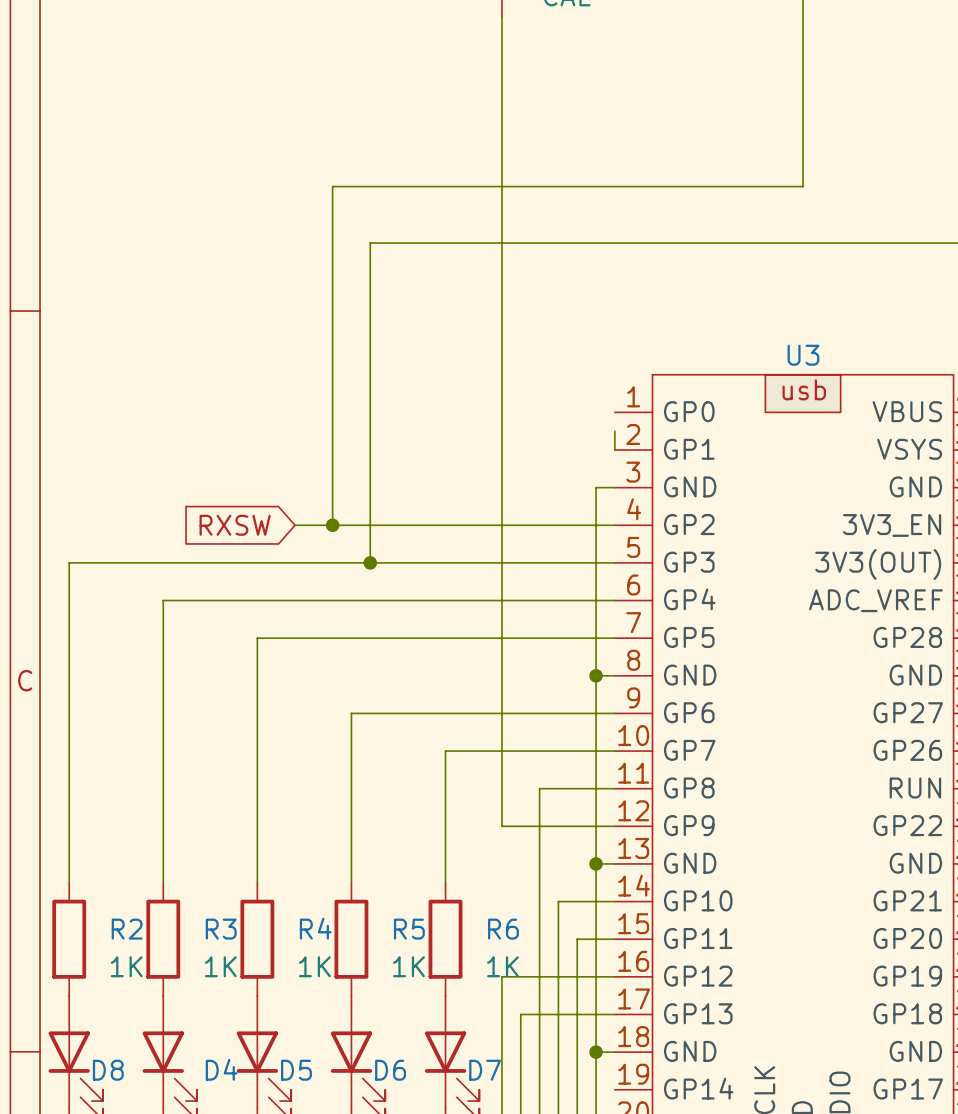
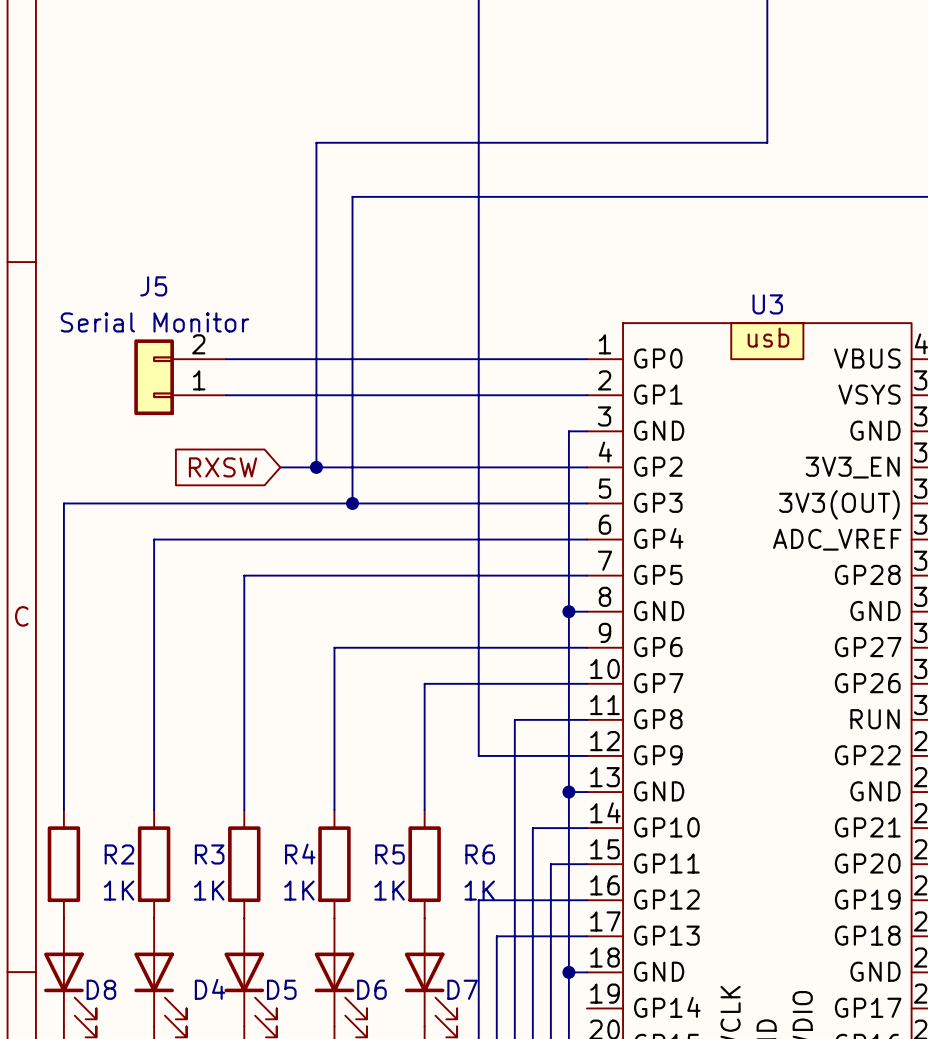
wire: none -> (226, 359) (586, 359)
J5: none -> Serial Monitor (180, 377)
wire: (614, 431) (614, 450) -> (226, 395) (586, 395)

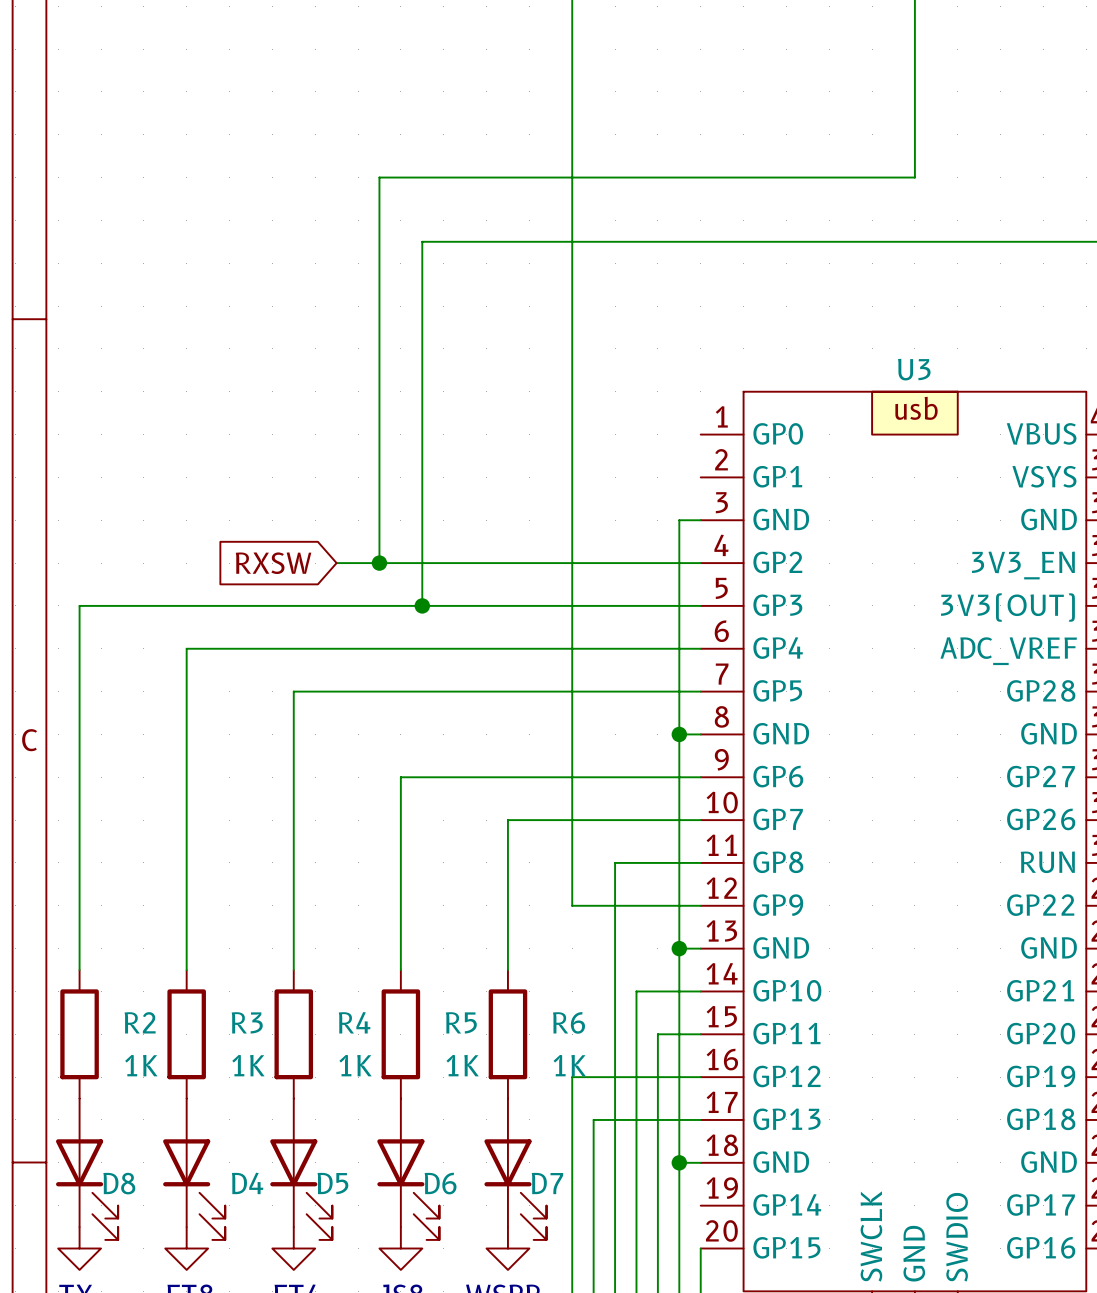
wire: (226, 359) (586, 359) -> none
J5: Serial Monitor (180, 377) -> none
wire: (226, 395) (586, 395) -> none

